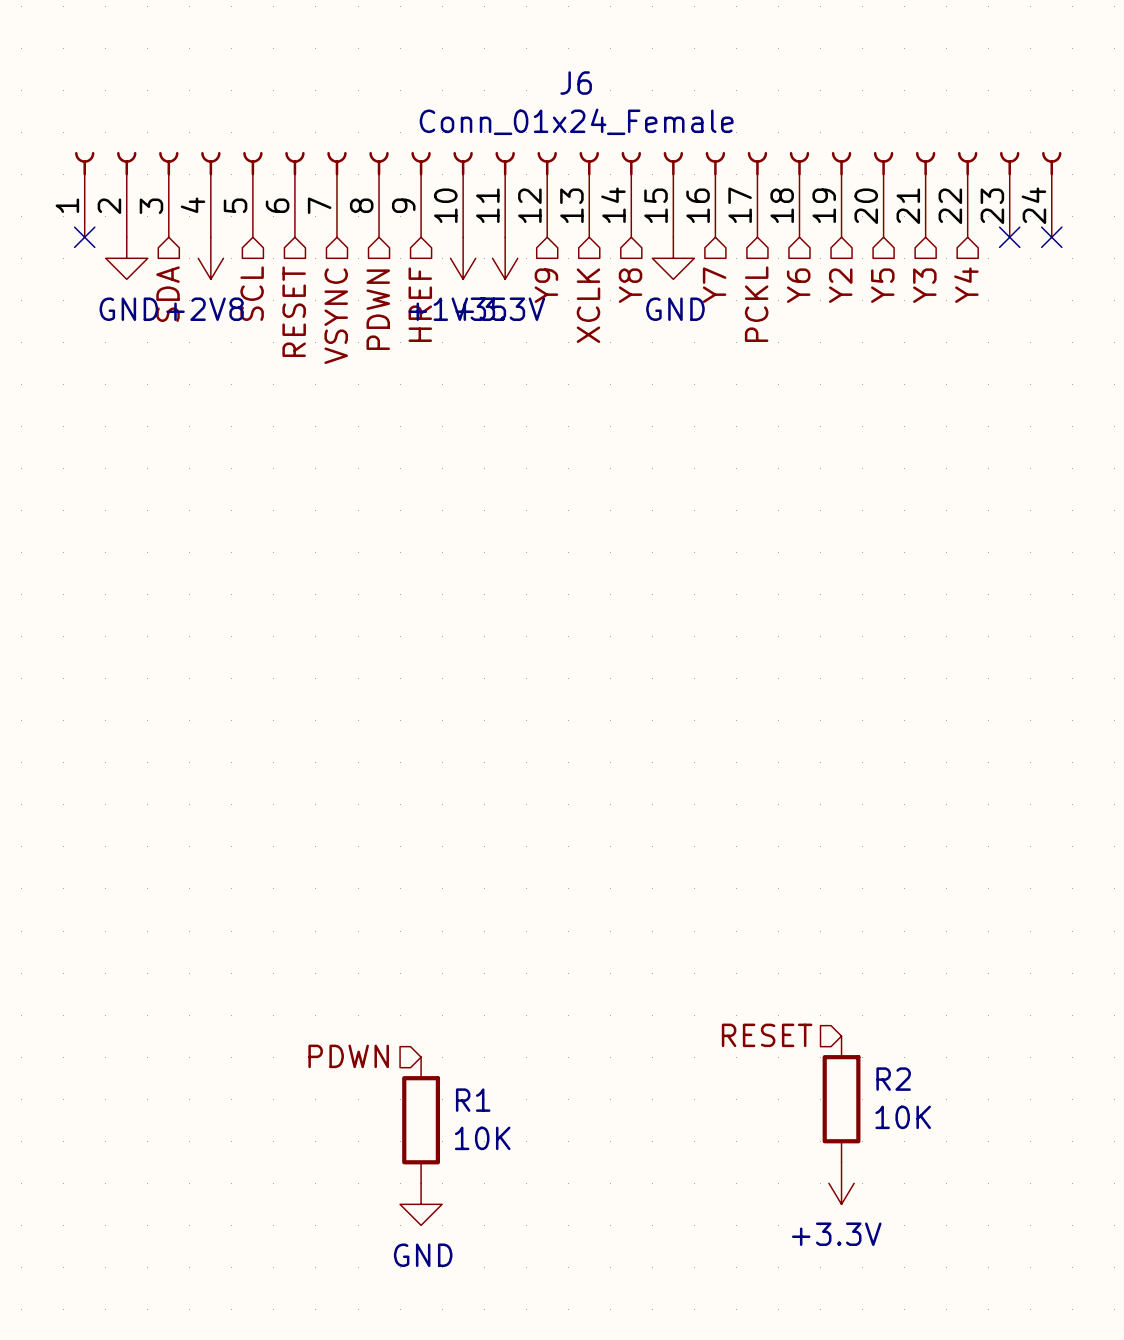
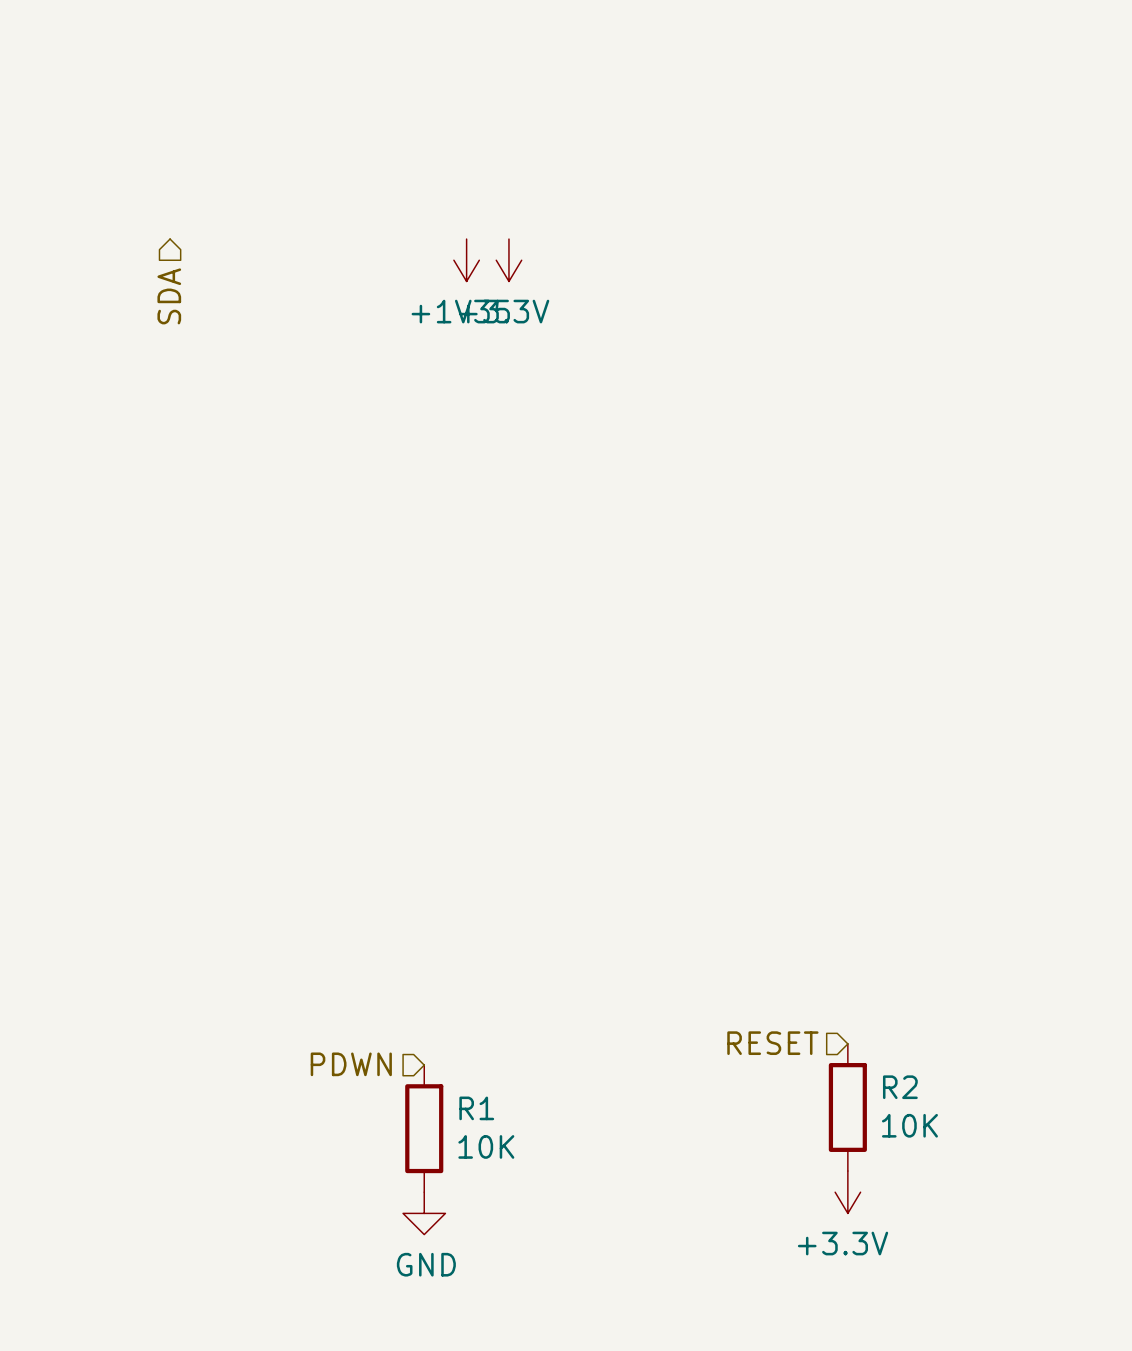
J6: Conn_01x24_Female (568, 194) -> none
no-connect mark: (84, 237) -> none
no-connect mark: (1009, 237) -> none
no-connect mark: (1051, 237) -> none
power symbol: GND (126, 258) -> none
power symbol: +2V8 (210, 258) -> none
power symbol: GND (673, 258) -> none
hierarchical label: Y9 (546, 285) -> none
hierarchical label: Y8 (630, 285) -> none
hierarchical label: Y7 (714, 285) -> none
hierarchical label: Y6 (798, 285) -> none
hierarchical label: Y2 (840, 285) -> none
hierarchical label: Y5 (882, 285) -> none
hierarchical label: Y3 (924, 285) -> none
hierarchical label: Y4 (966, 285) -> none
hierarchical label: SCL (252, 293) -> none
hierarchical label: HREF (420, 304) -> none
hierarchical label: PCKL (756, 304) -> none
hierarchical label: XCLK (588, 305) -> none
hierarchical label: PDWN (378, 309) -> none
hierarchical label: RESET (294, 311) -> none
hierarchical label: VSYNC (336, 316) -> none

